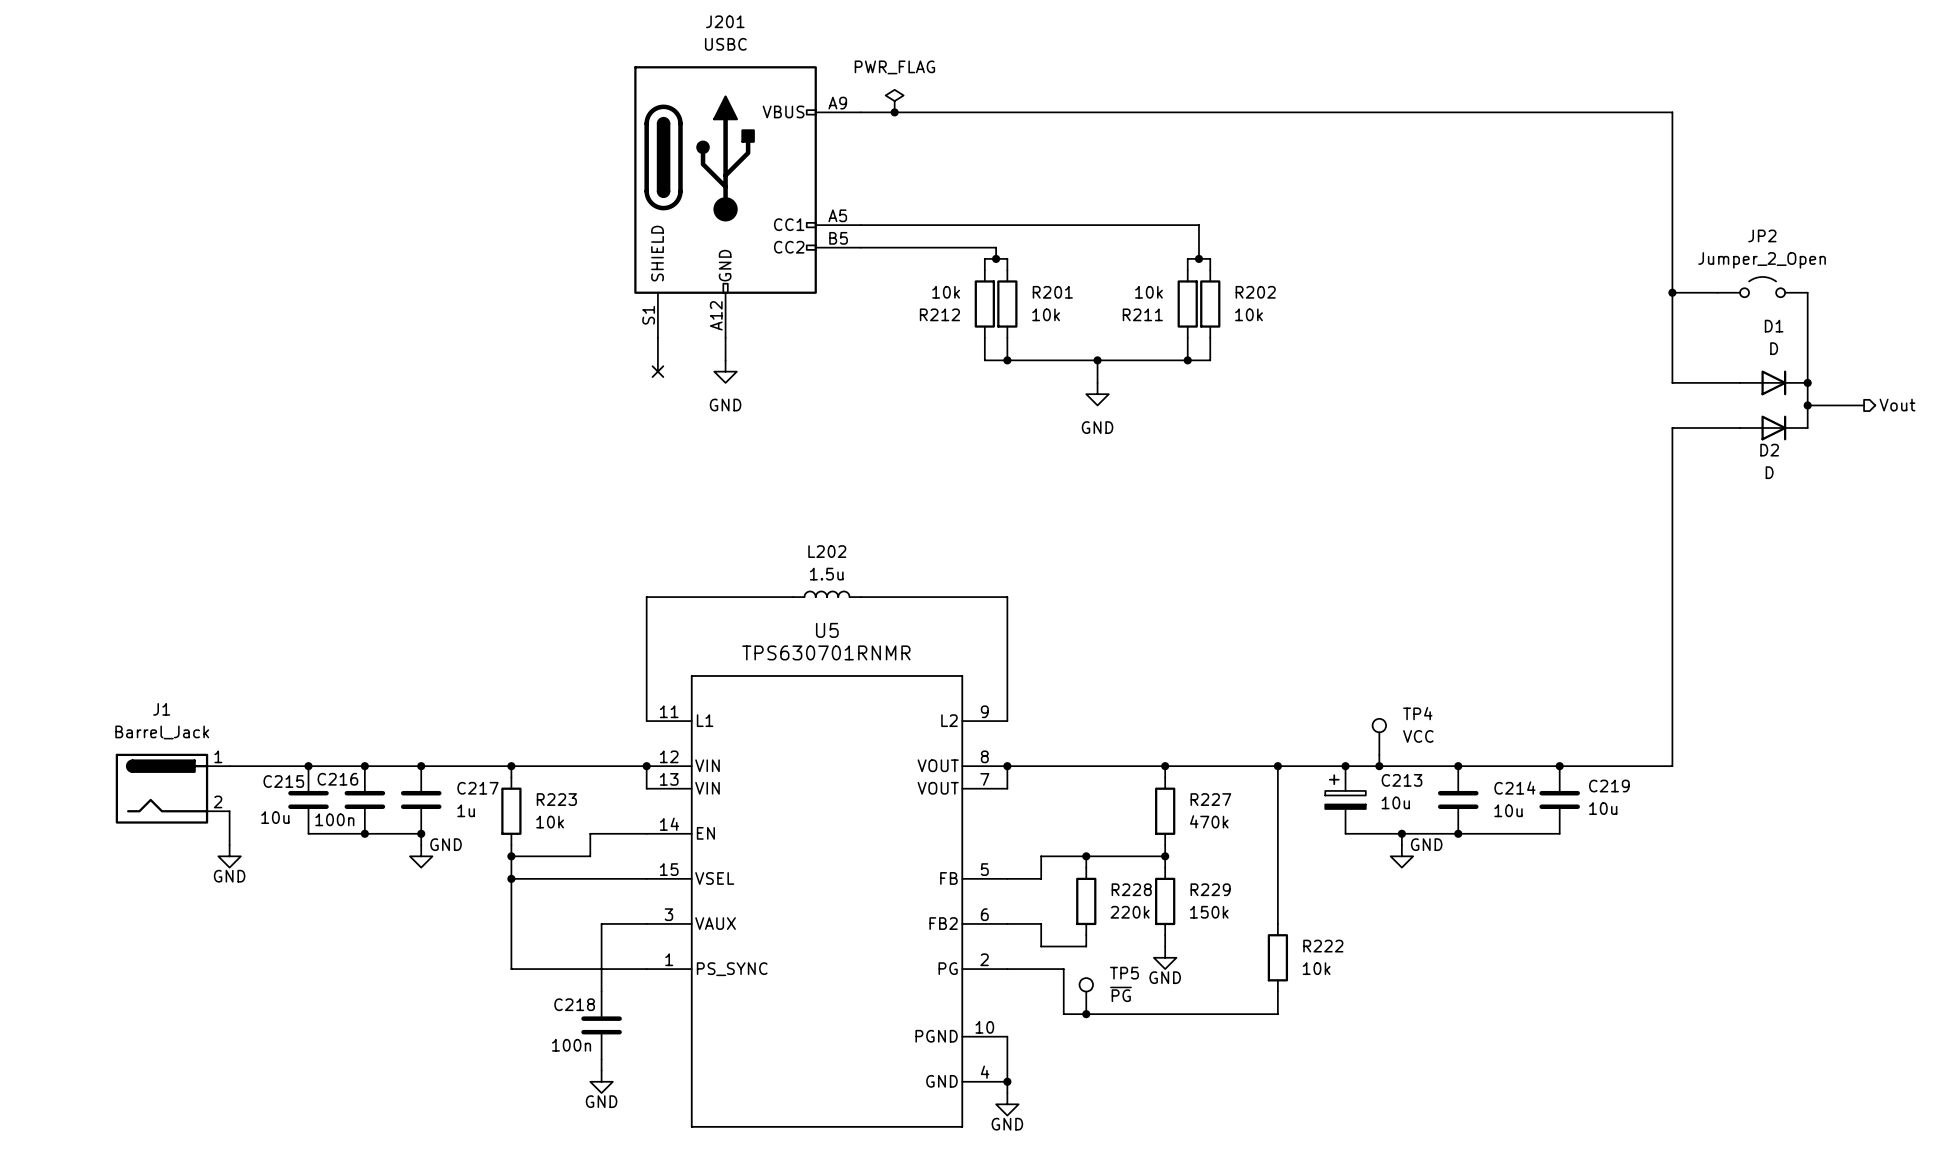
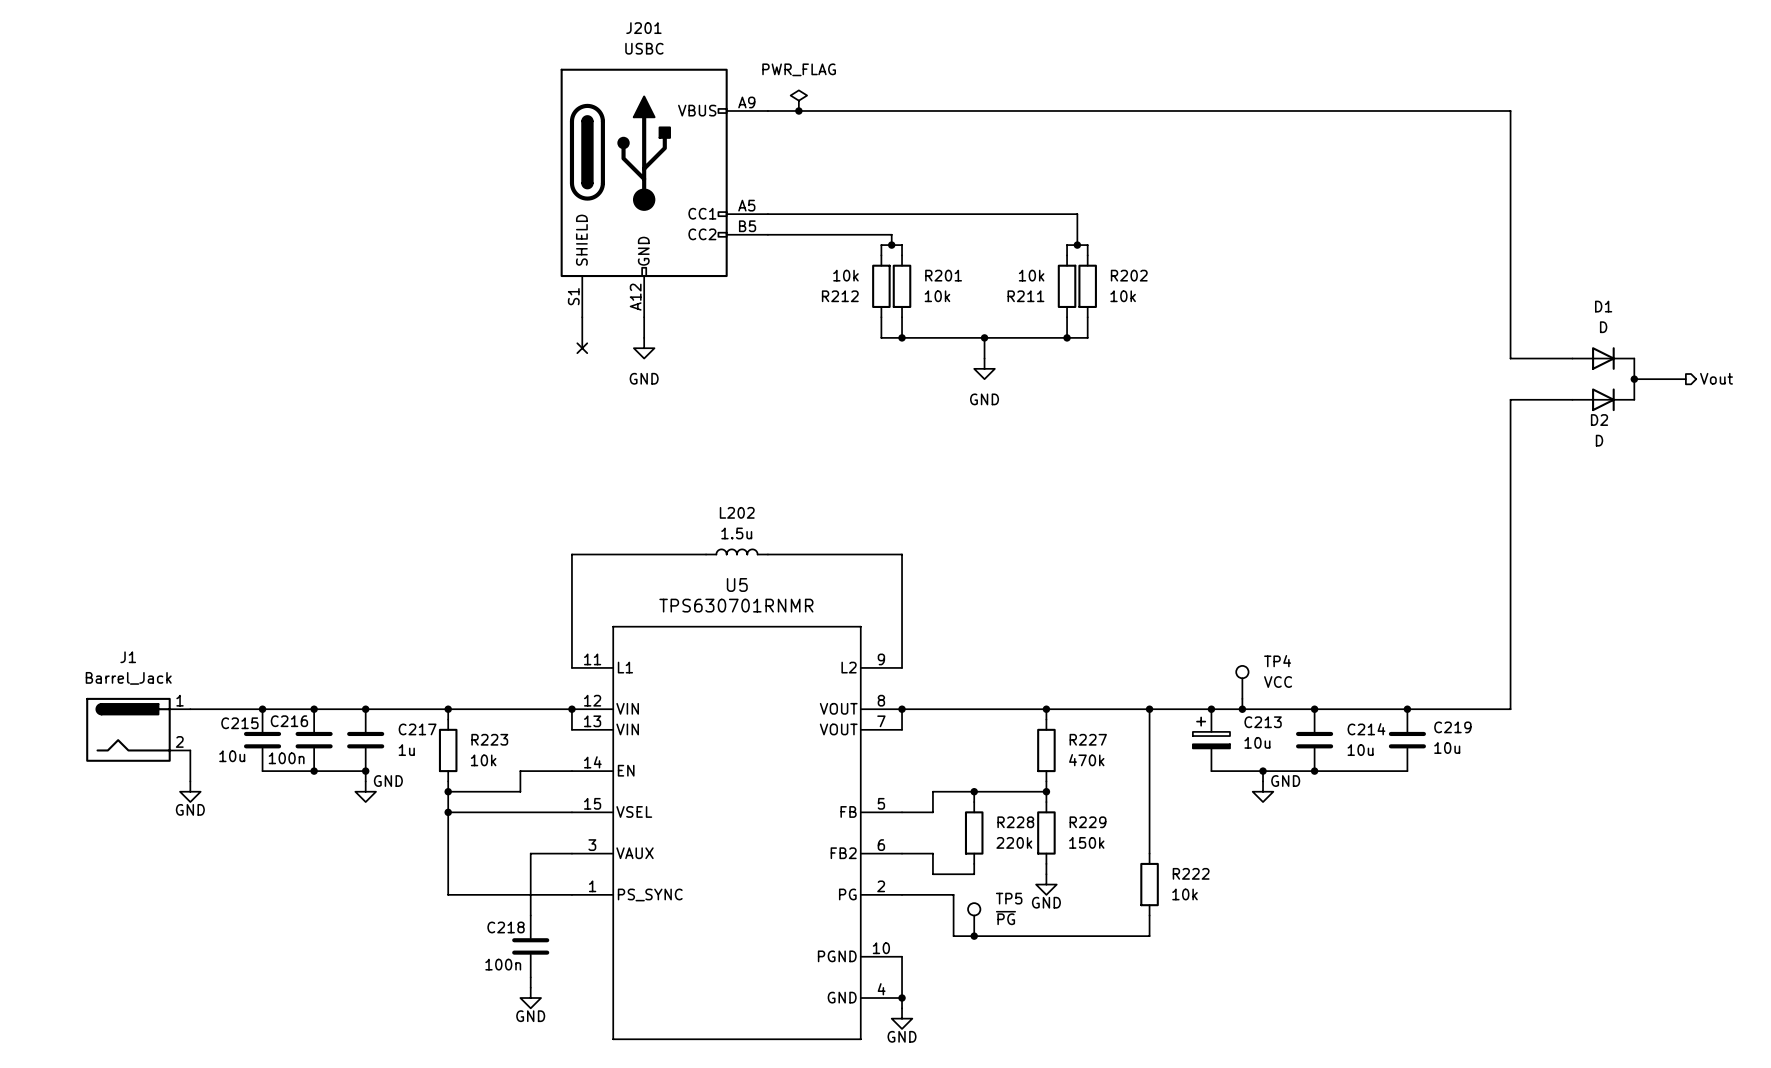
JP2: Jumper_2_Open (1762, 287) -> none
wire: (1672, 292) (1717, 292) -> none
junction: (1672, 292) -> none
wire: (1807, 292) (1807, 382) -> none
junction: (1807, 382) -> none

